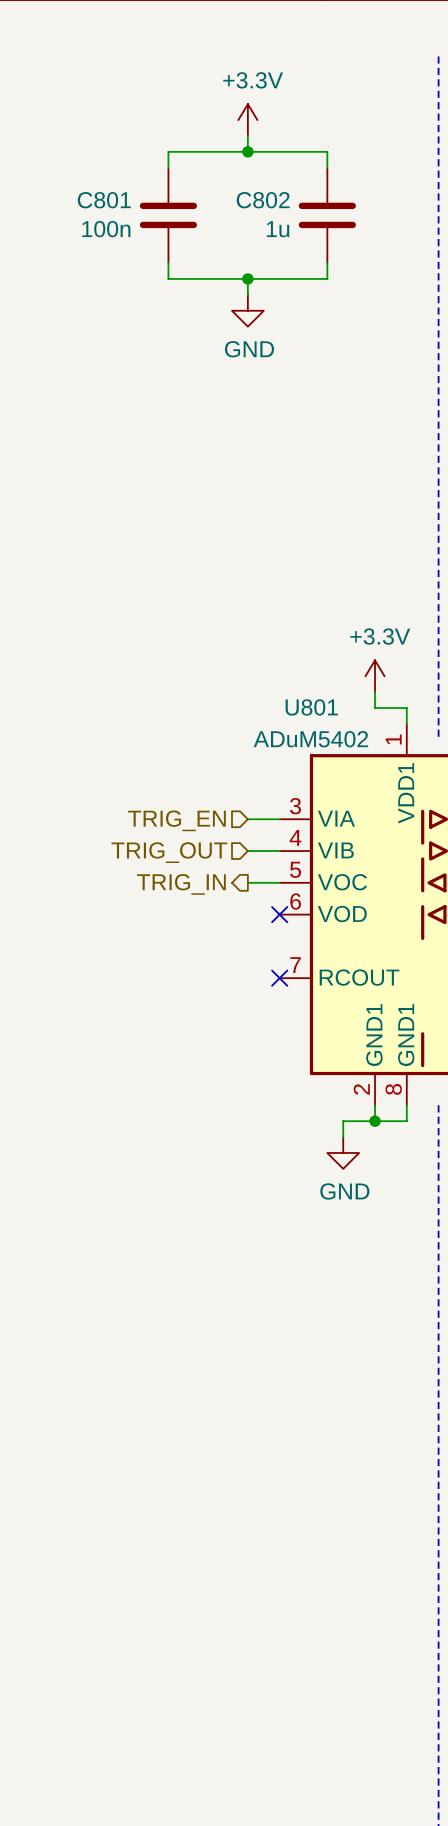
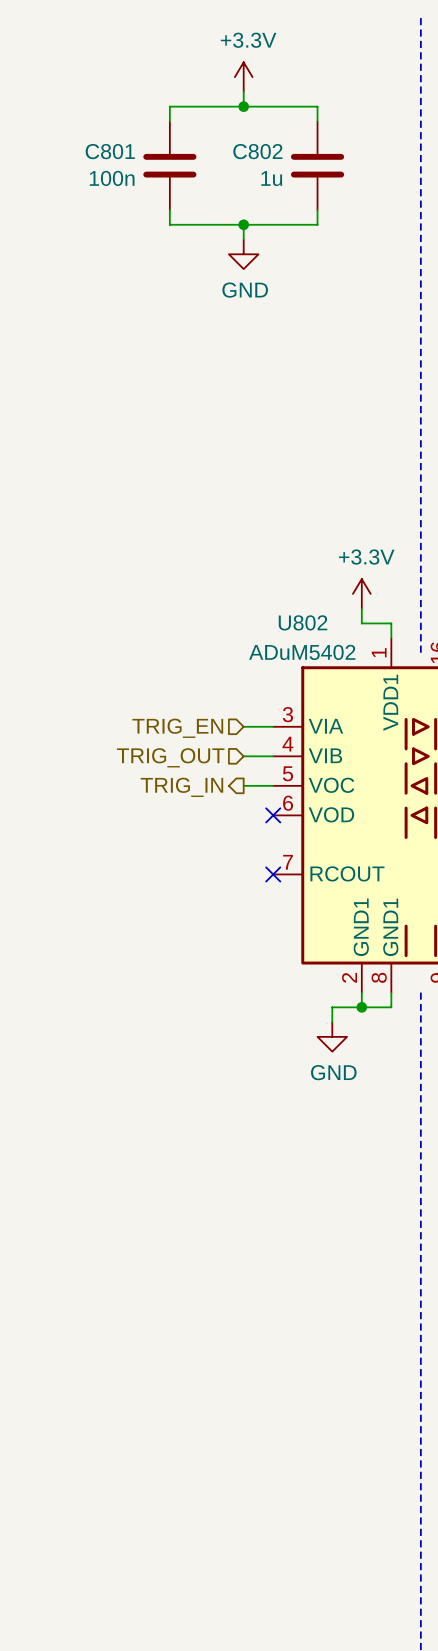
U801 name: U801 (311, 707) -> U802 (303, 622)

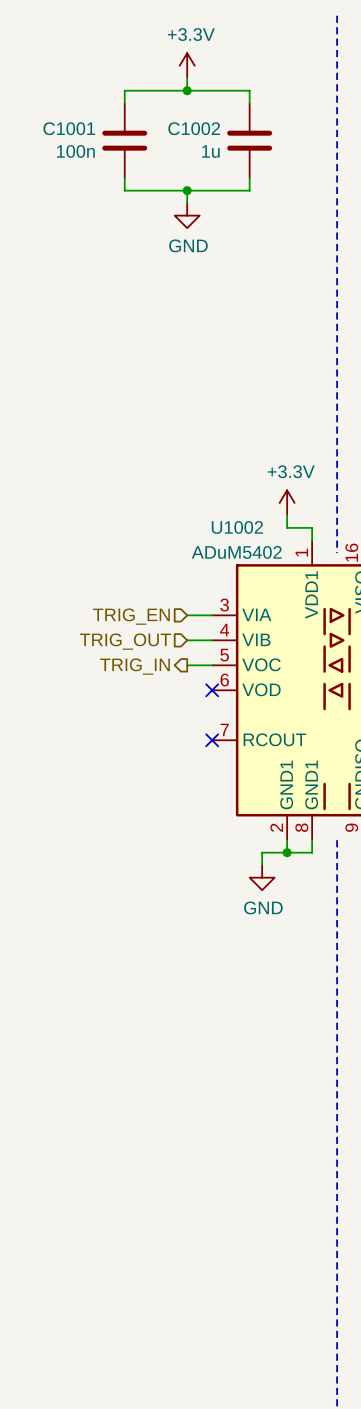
C801 name: C801 (110, 151) -> C1001 (69, 128)
C802 name: C802 (257, 151) -> C1002 (194, 128)
U802 name: U802 (303, 622) -> U1002 (237, 527)

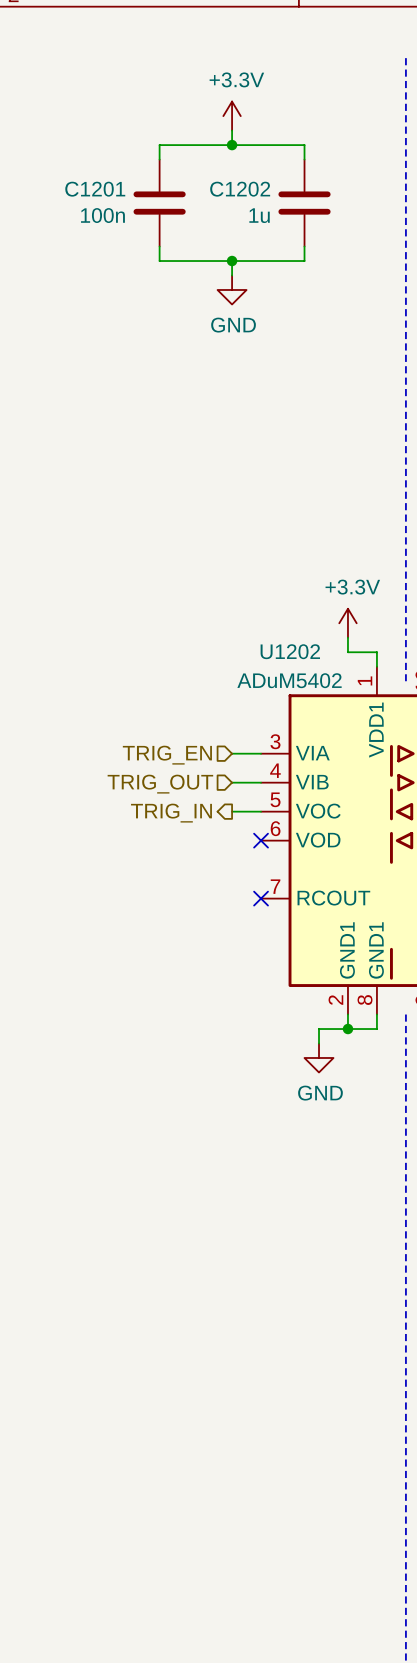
C1001 name: C1001 (69, 128) -> C1201 (95, 189)
C1002 name: C1002 (194, 128) -> C1202 (240, 189)
U1002 name: U1002 (237, 527) -> U1202 (290, 651)

